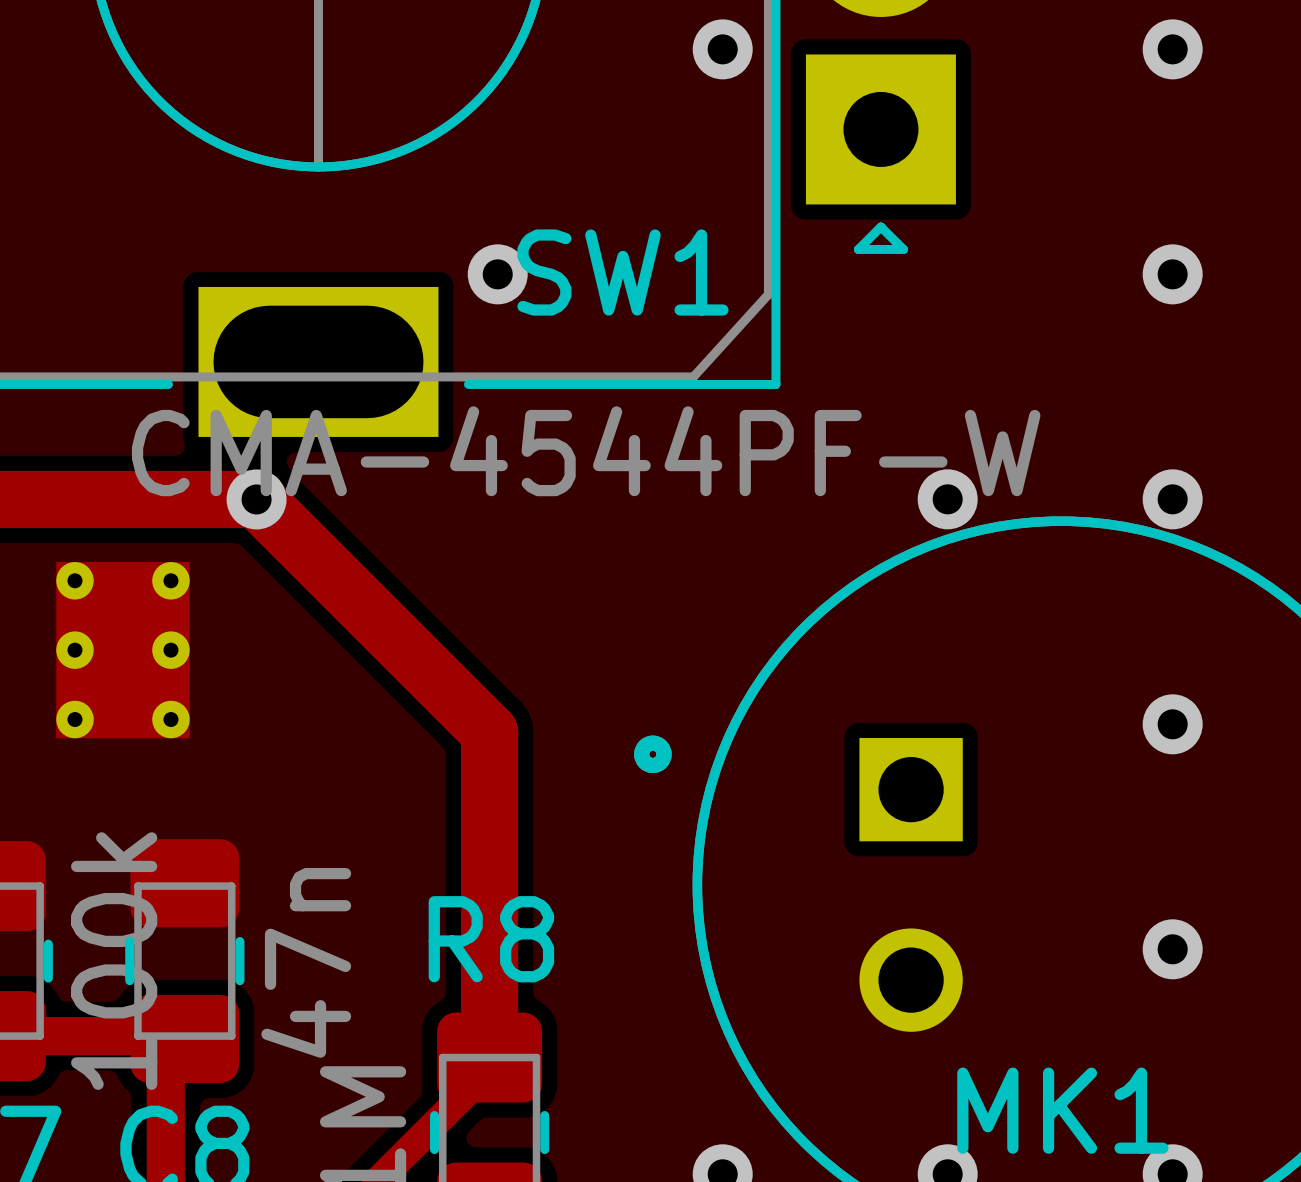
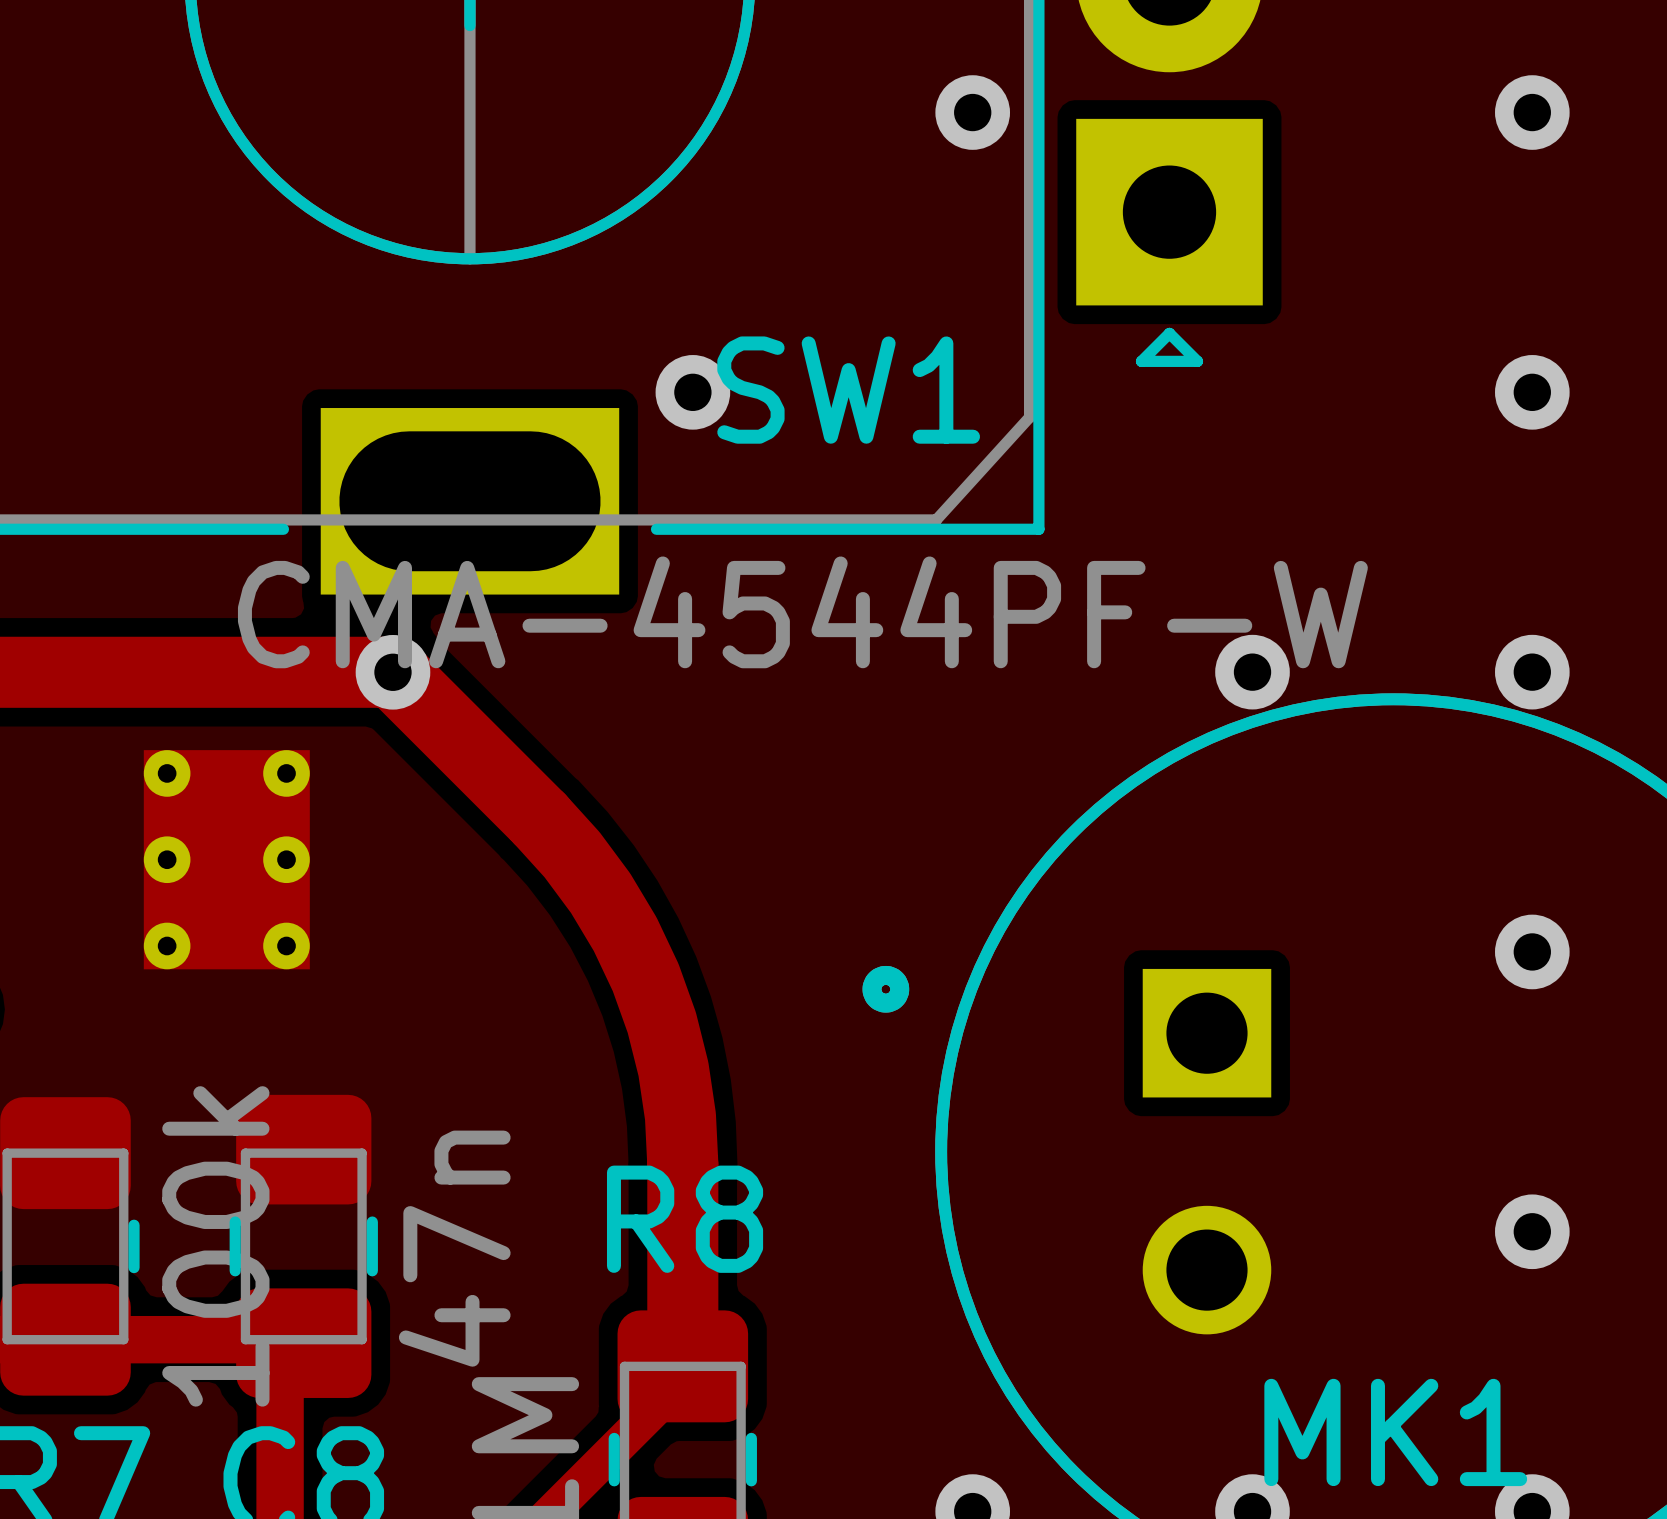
track: (374, 617) (489, 732) (489, 895) -> (539, 819) (572, 854) (600, 893) (625, 934) (645, 977) (661, 1022) (673, 1069) (680, 1116) (682, 1164)

